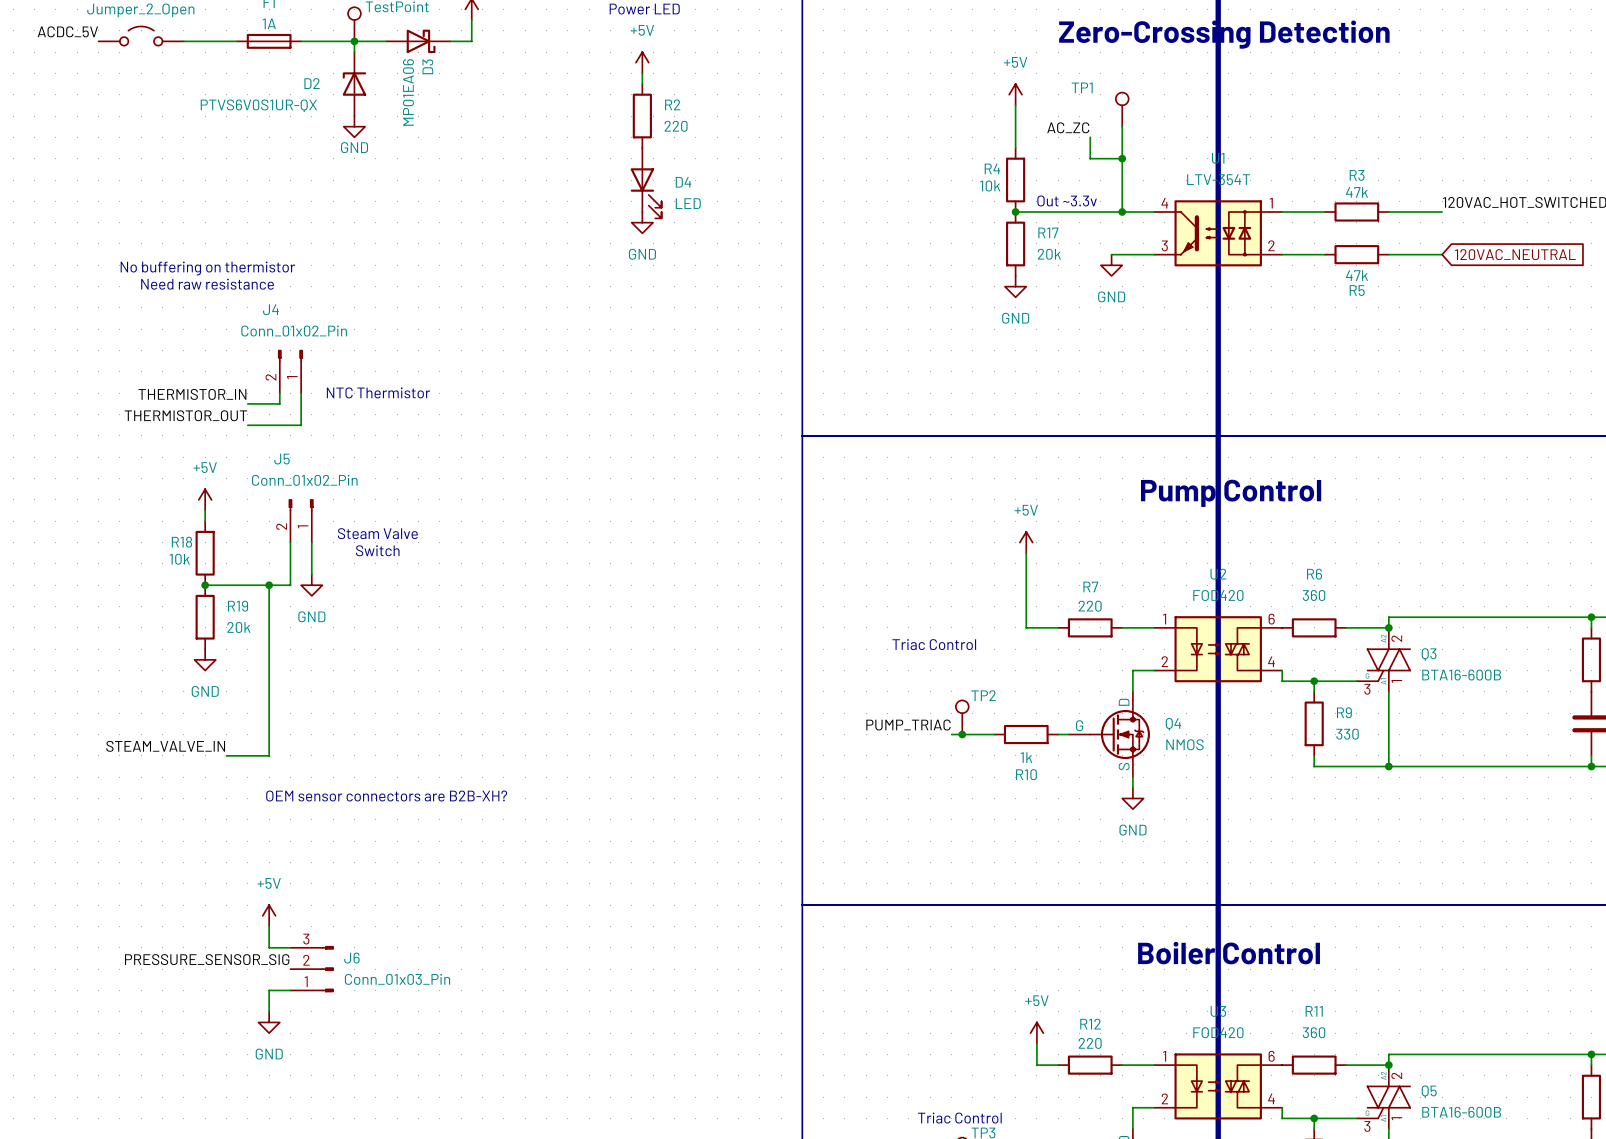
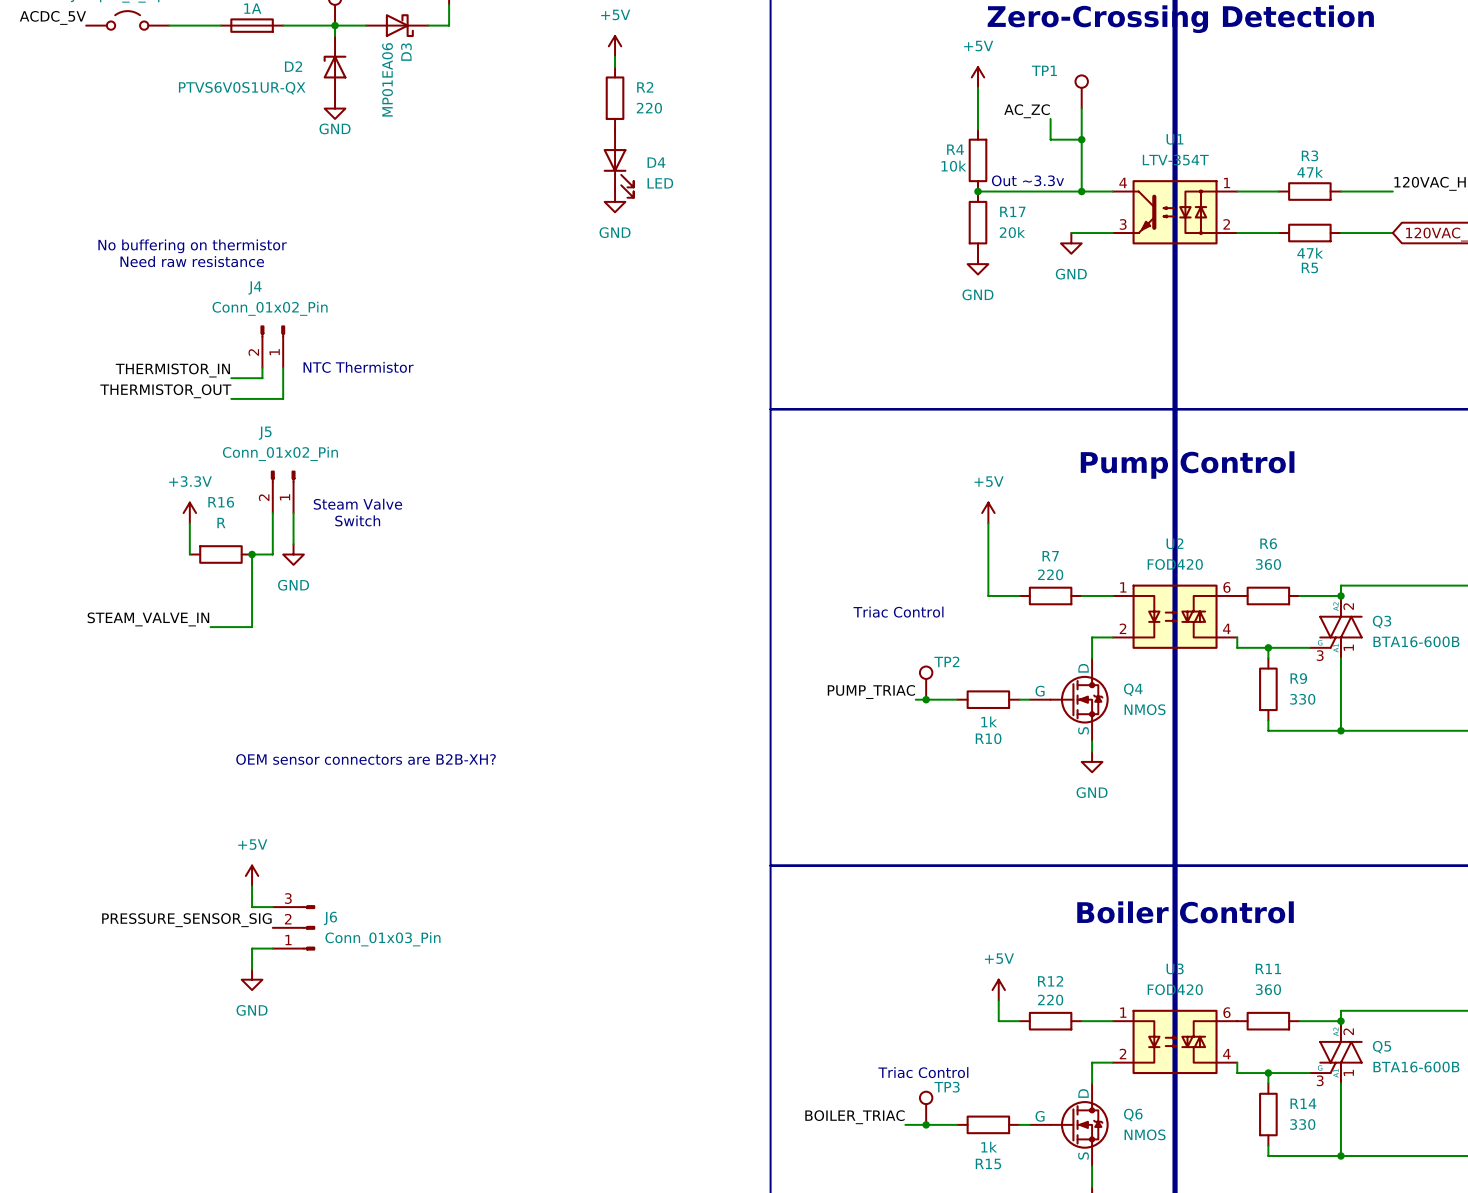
power symbol: +5V (205, 499) -> none
wire: (205, 510) (205, 521) -> none
power symbol: none -> +3.3V (189, 513)
R18: 10k (205, 553) -> none
wire: (205, 585) (269, 585) -> (189, 554) (189, 523)
junction: (205, 585) -> none
R16: none -> R (220, 554)
R19: 20k (205, 617) -> none
power symbol: GND (205, 659) -> none
wire: (269, 659) (269, 755) (226, 755) -> (252, 627) (210, 627)
label position: STEAM_VALVE_IN (165, 746) -> STEAM_VALVE_IN (148, 619)

